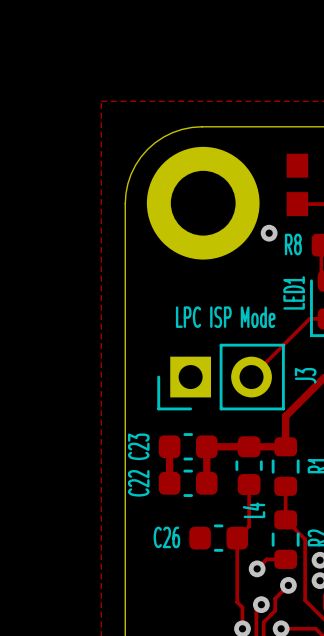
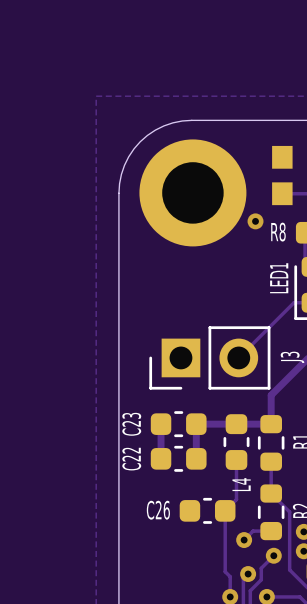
text: LPC ISP Mode (225, 317) -> none

